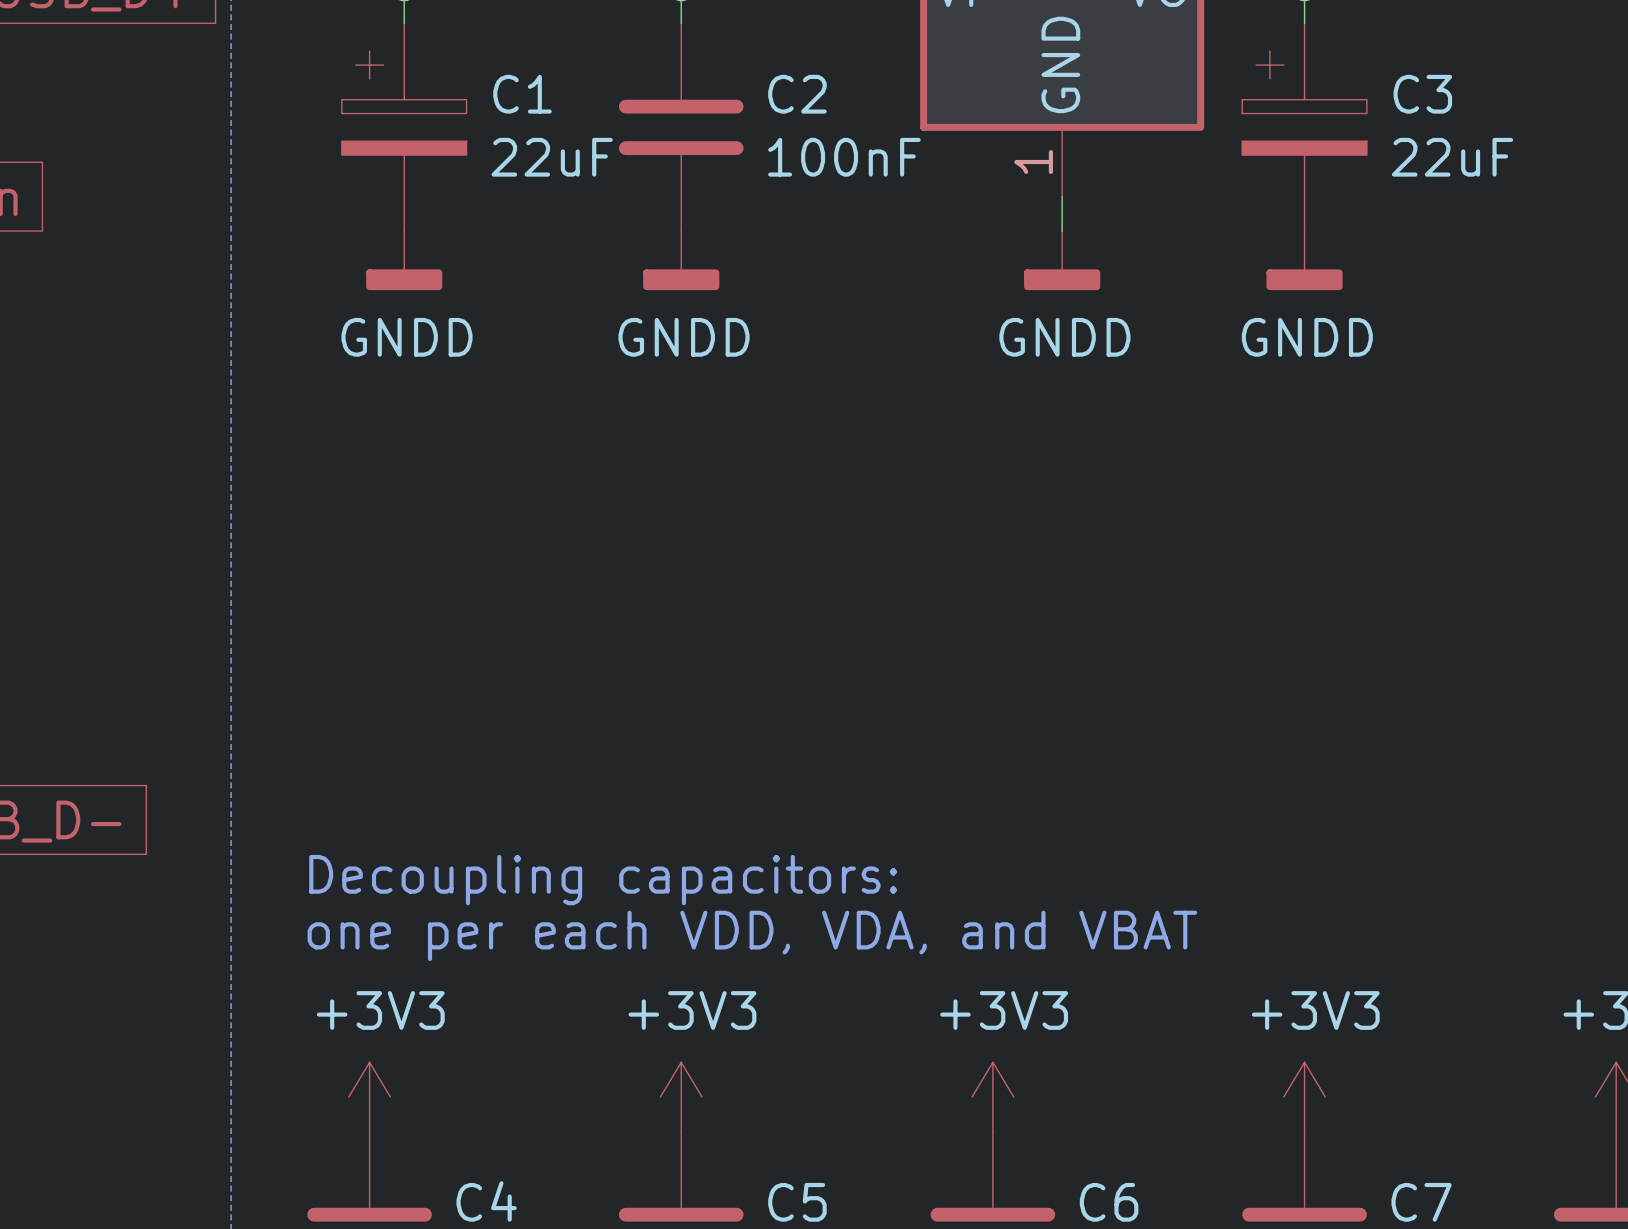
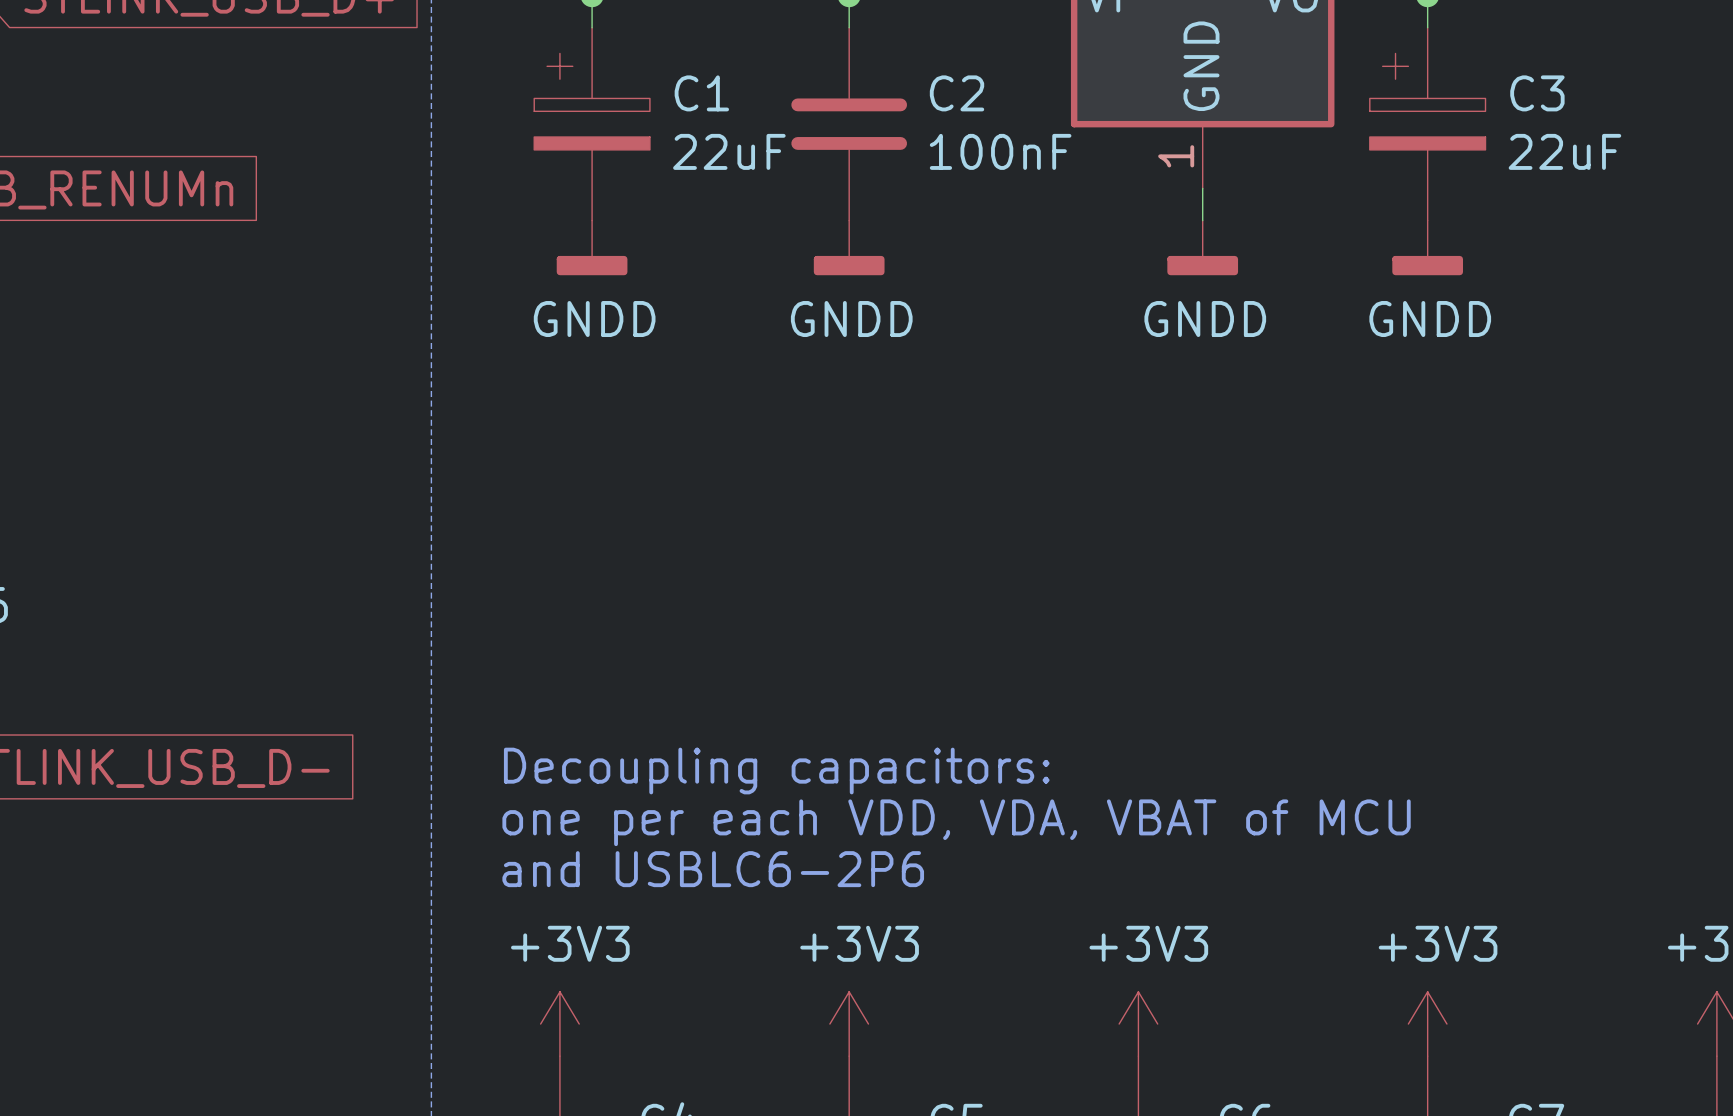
text: none -> Decoupling capacitors: (776, 771)
text: Decoupling capacitors: (603, 880) -> one per each VDD, VDA, VBAT of MCU (956, 822)
text: one per each VDD, VDA, and VBAT (752, 935) -> and USBLC6-2P6 (713, 869)

